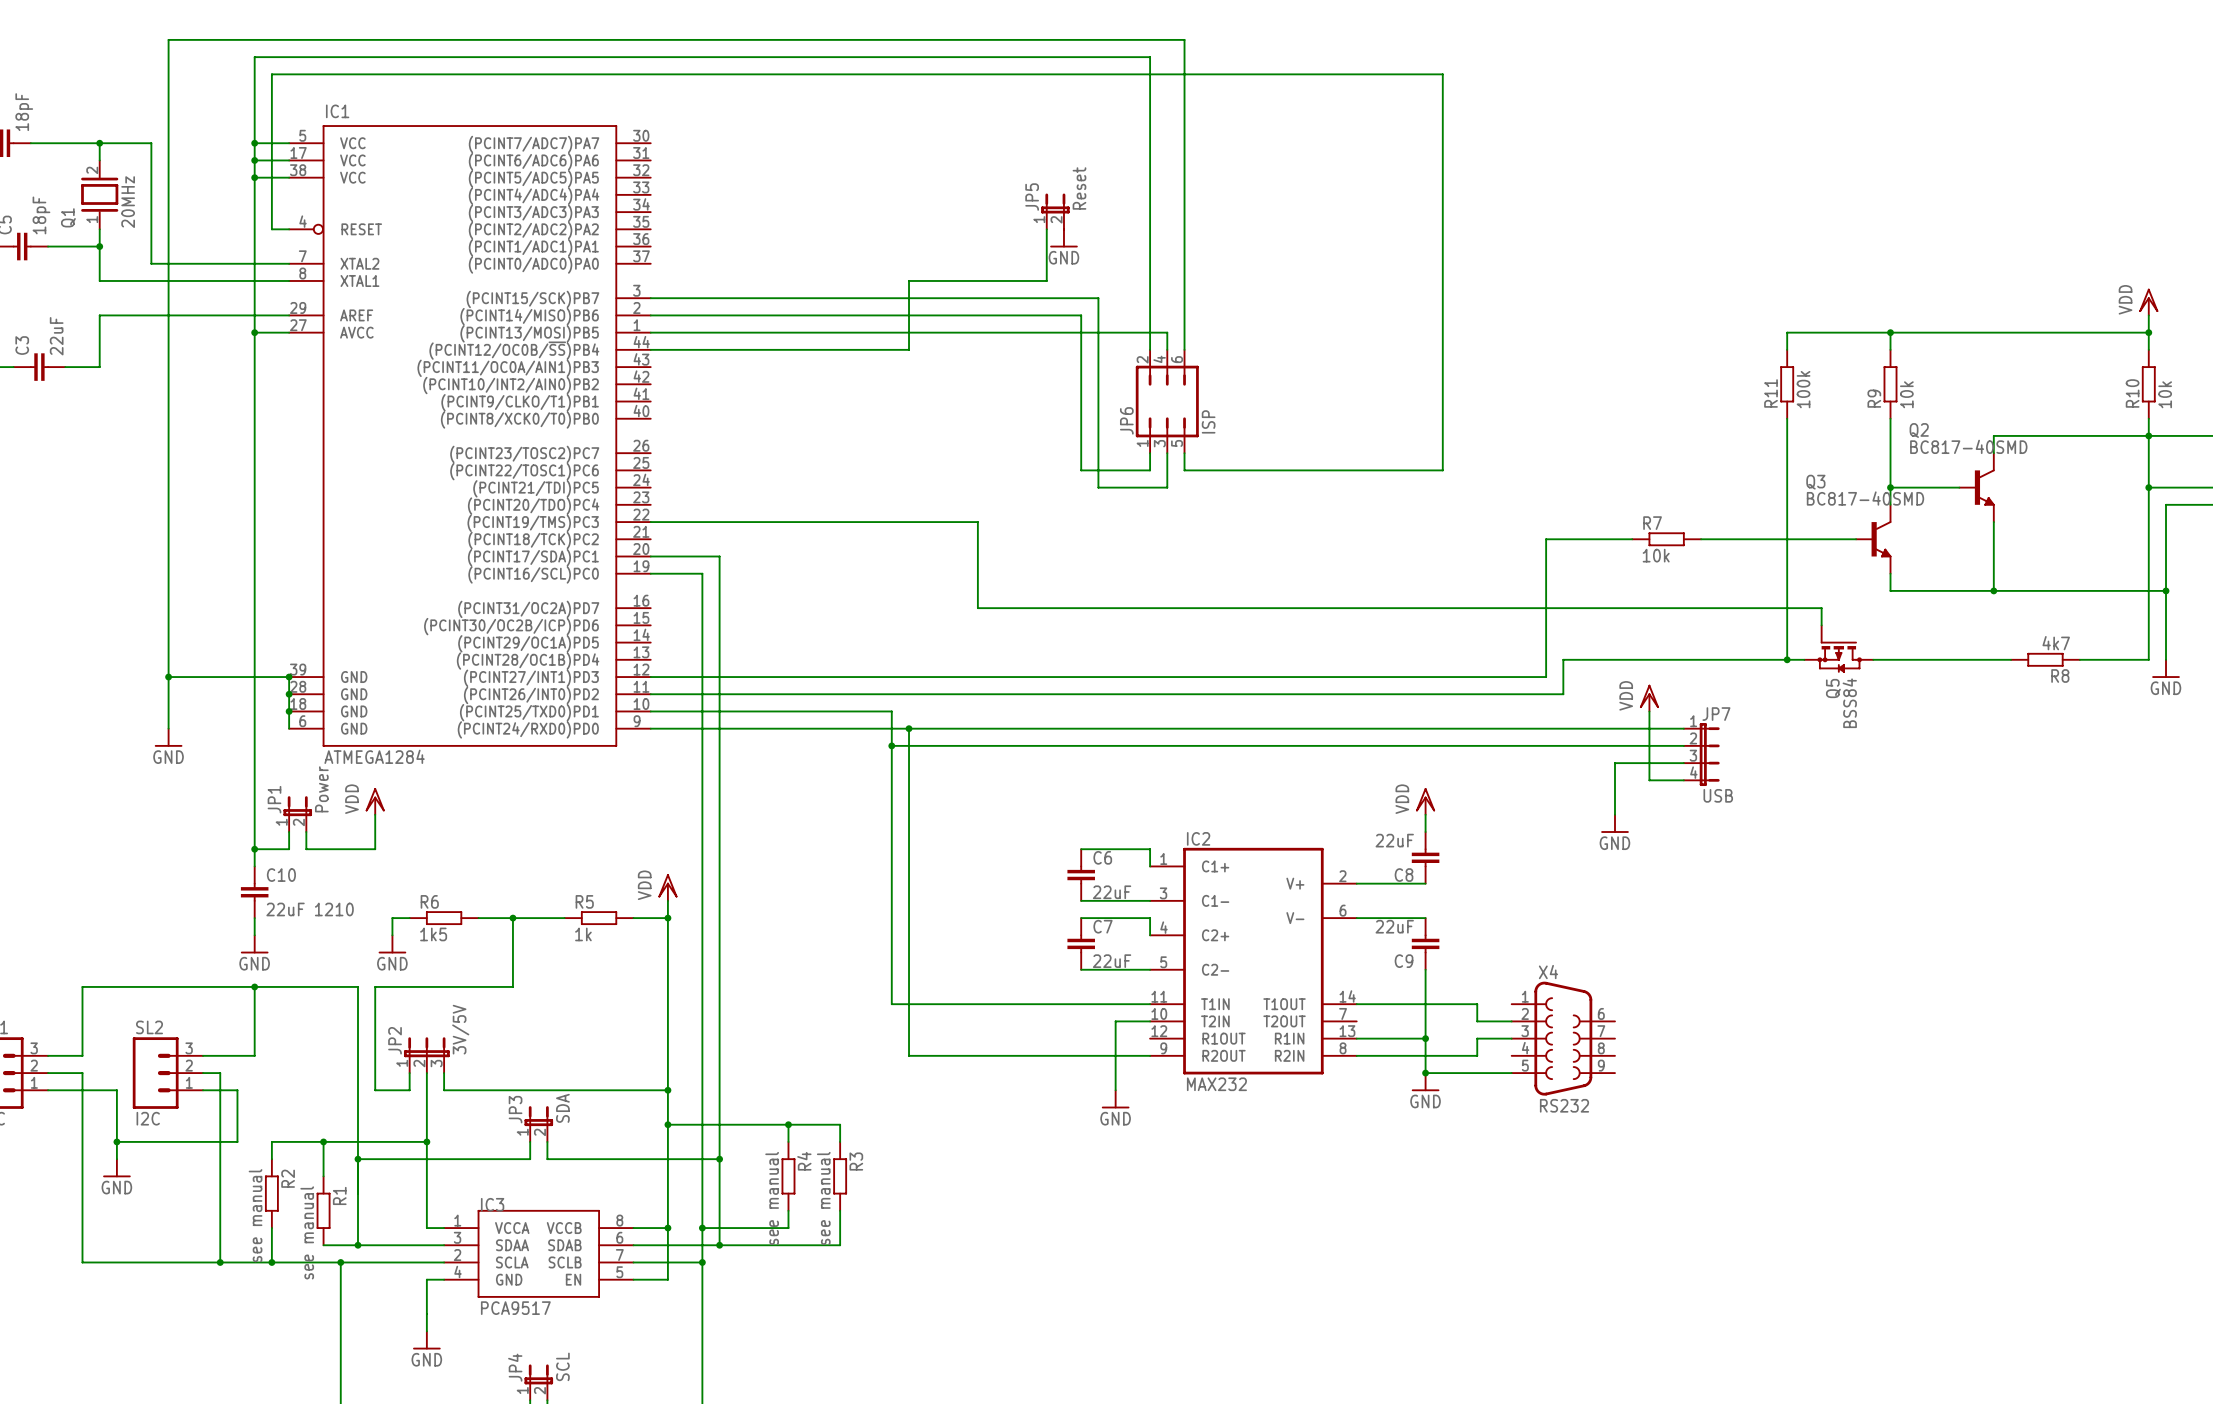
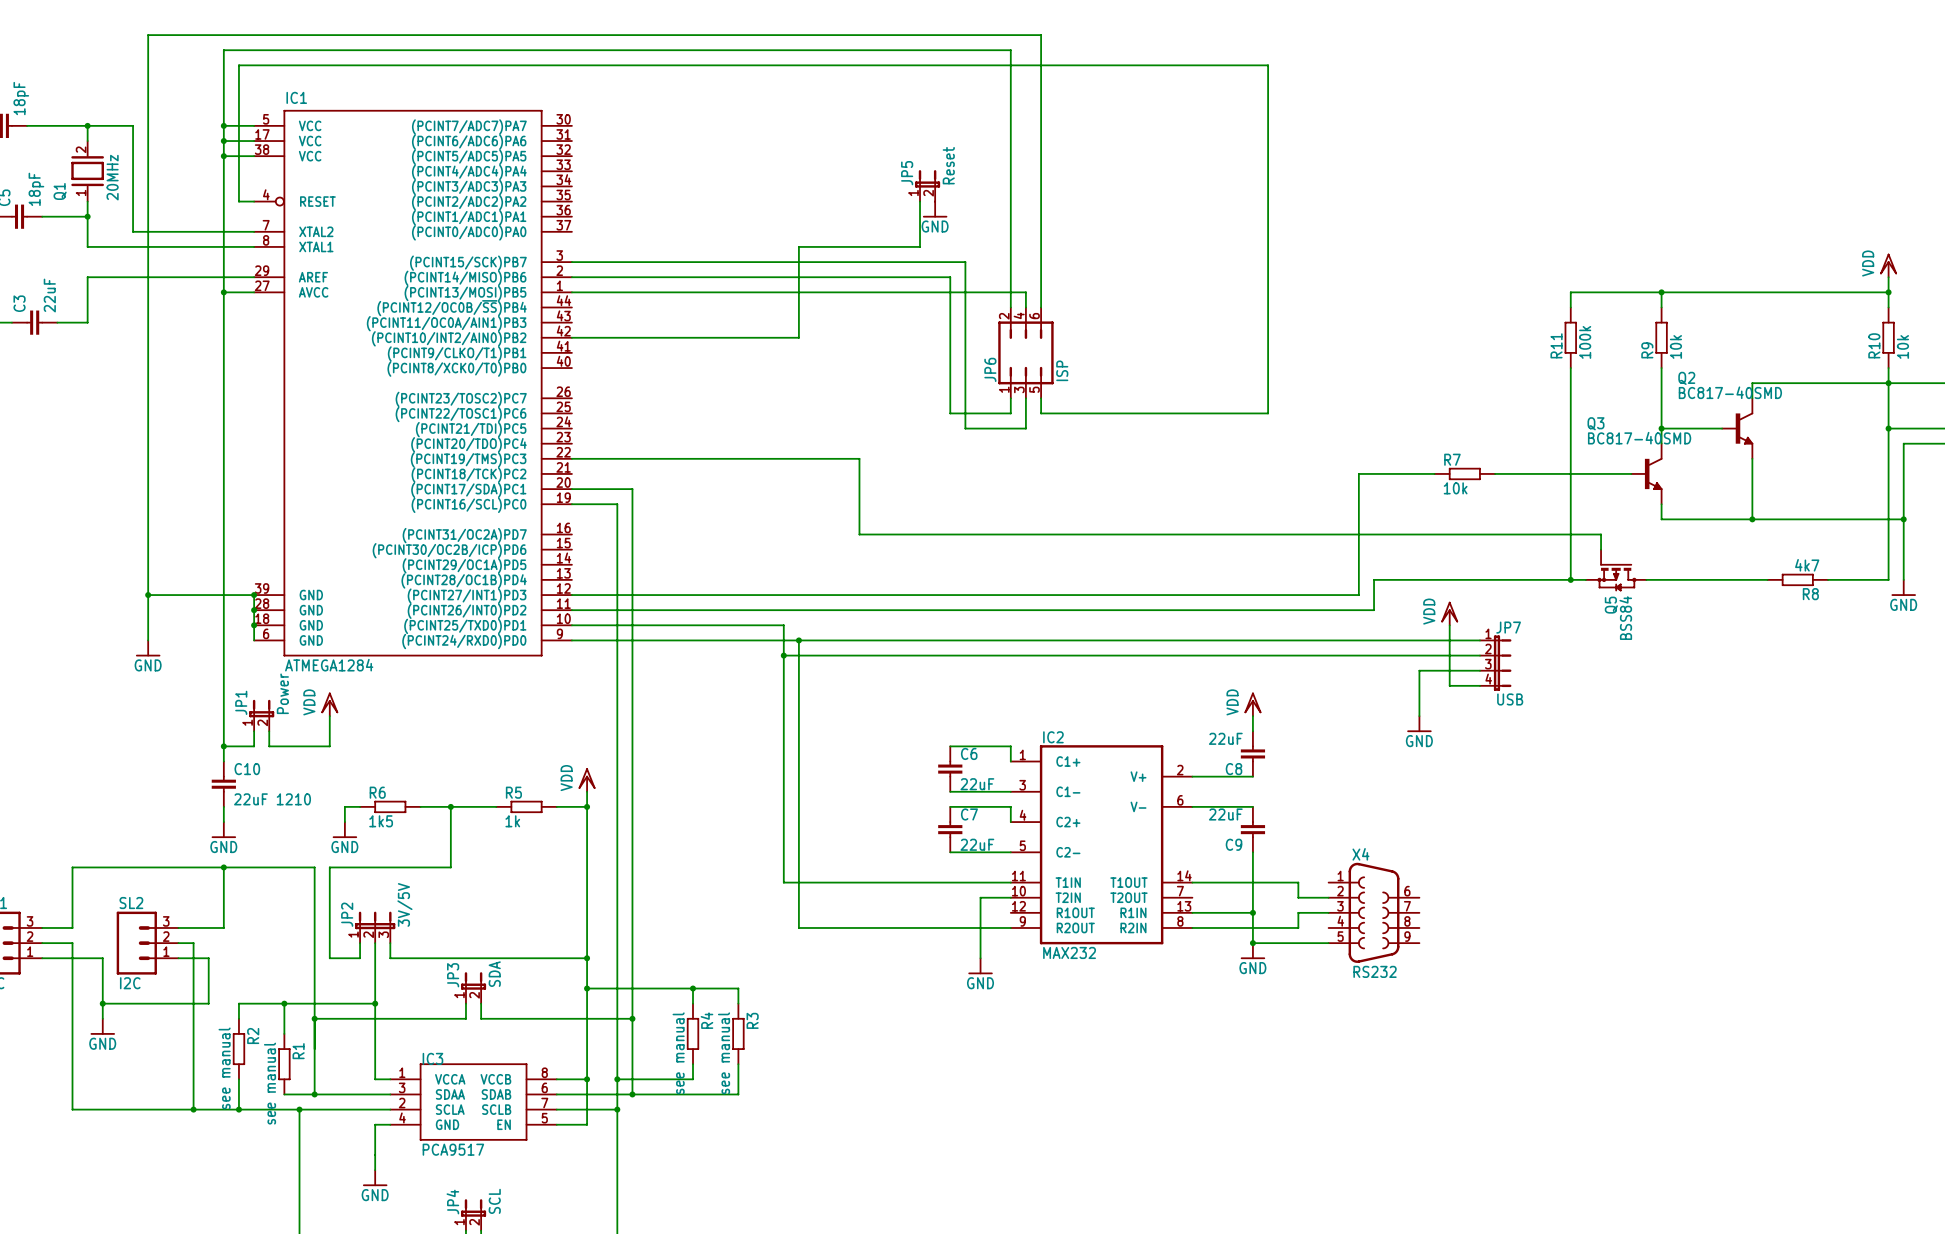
wire: (650, 349) (909, 349) -> (571, 337) (798, 337) (798, 307)

